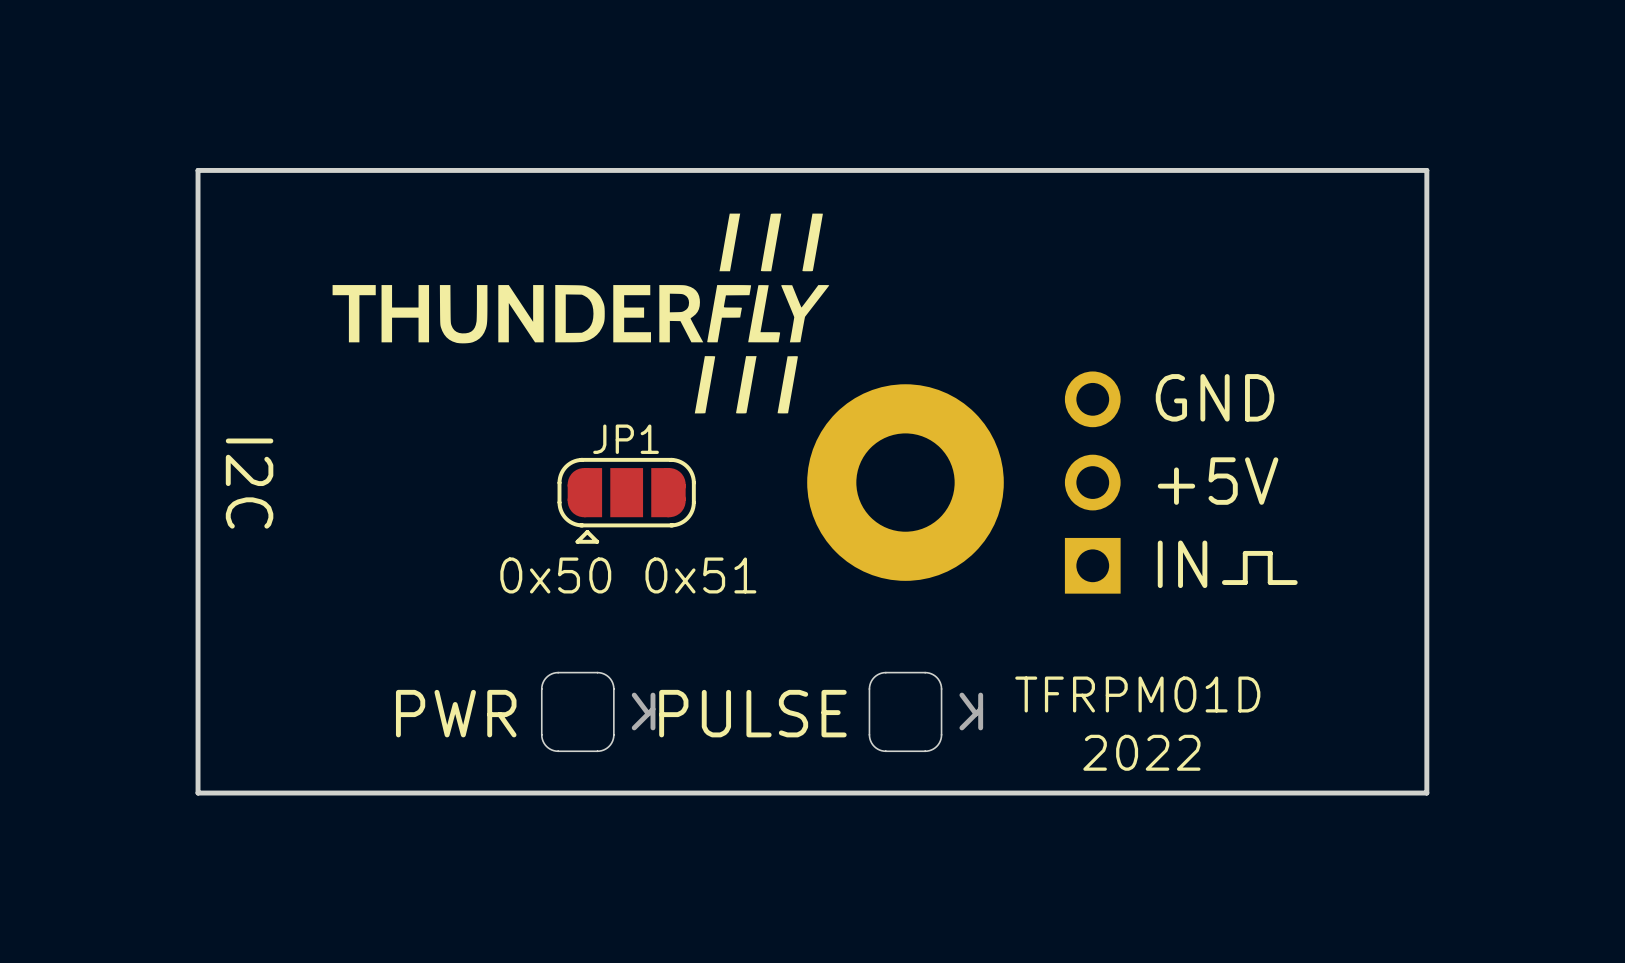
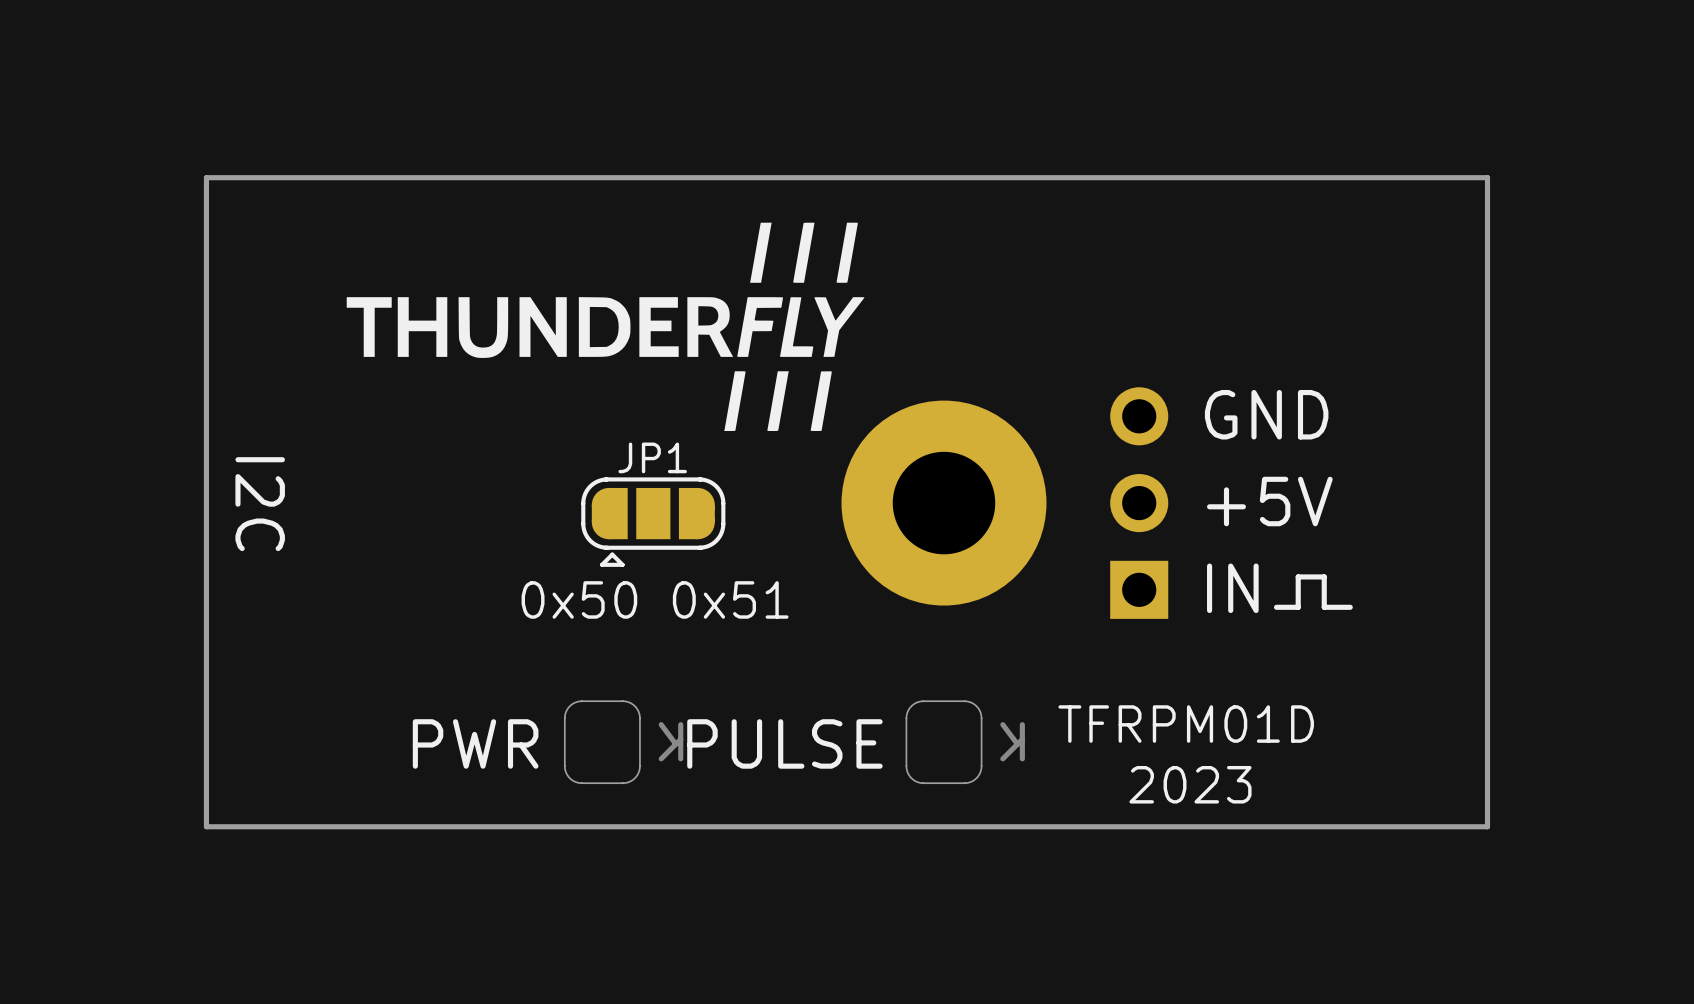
text: 2022 (1141, 752) -> 2023 (1190, 784)

